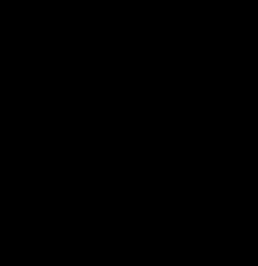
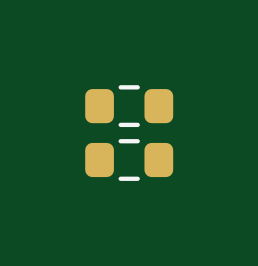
part: none -> (129, 106)
part: none -> (129, 160)

